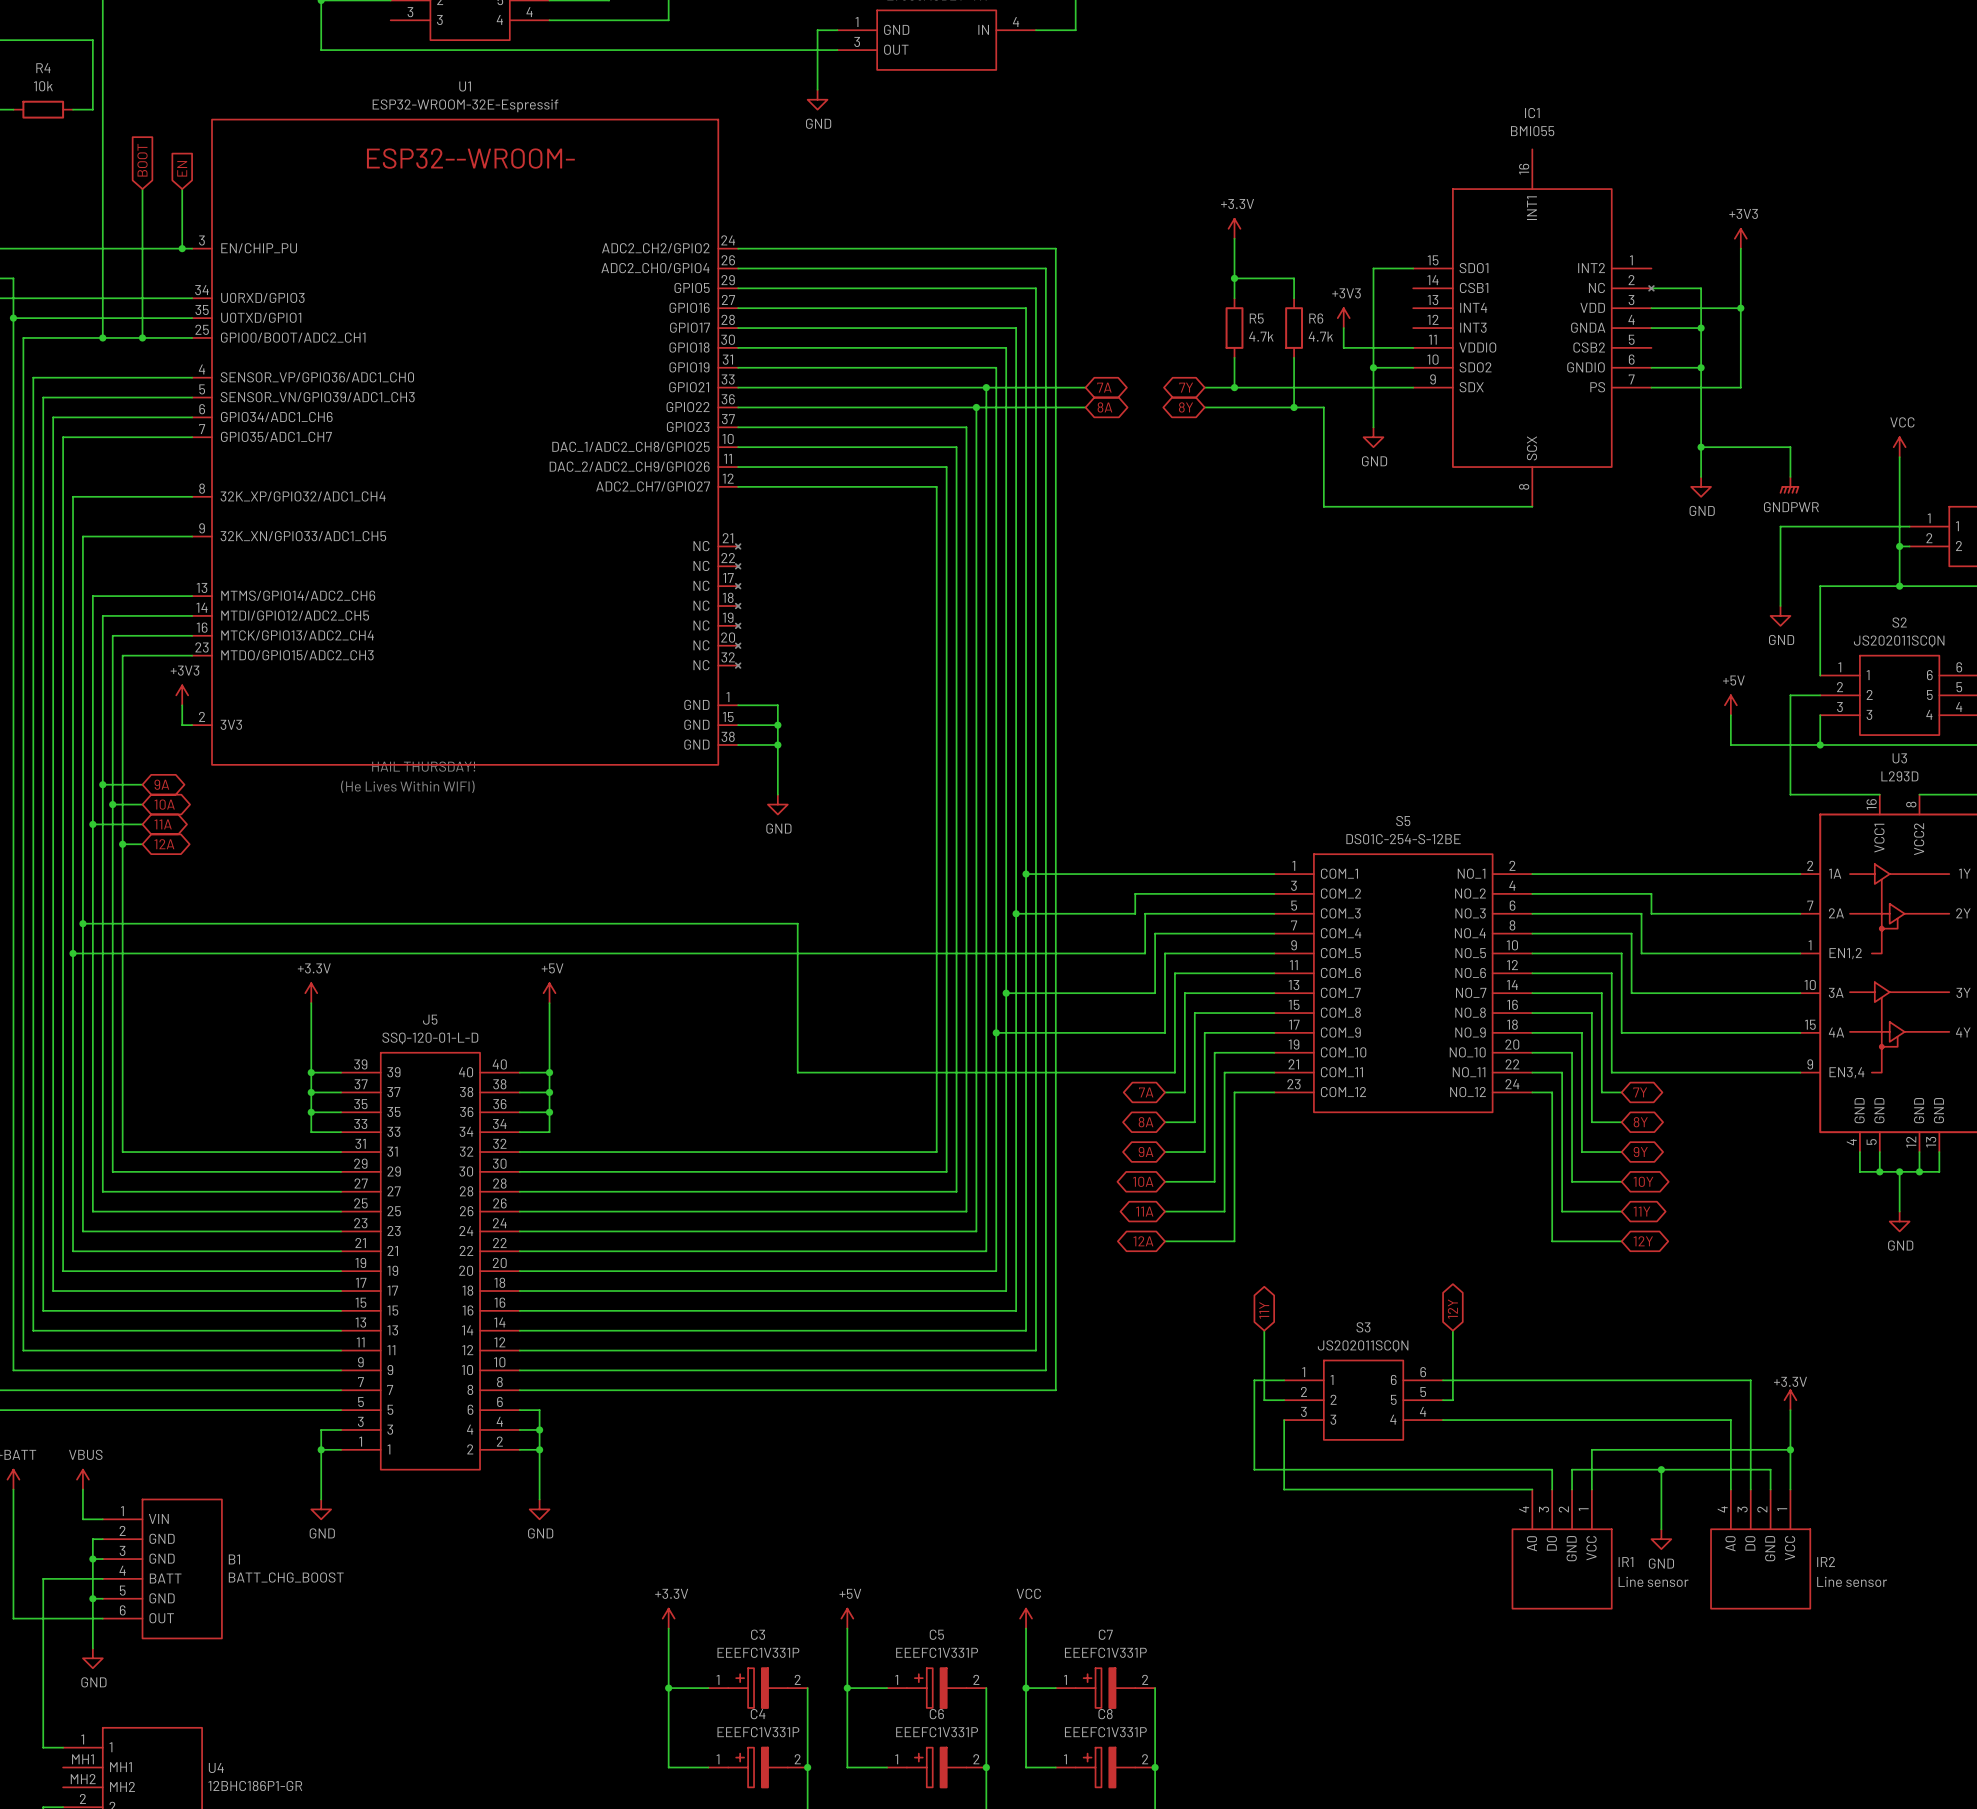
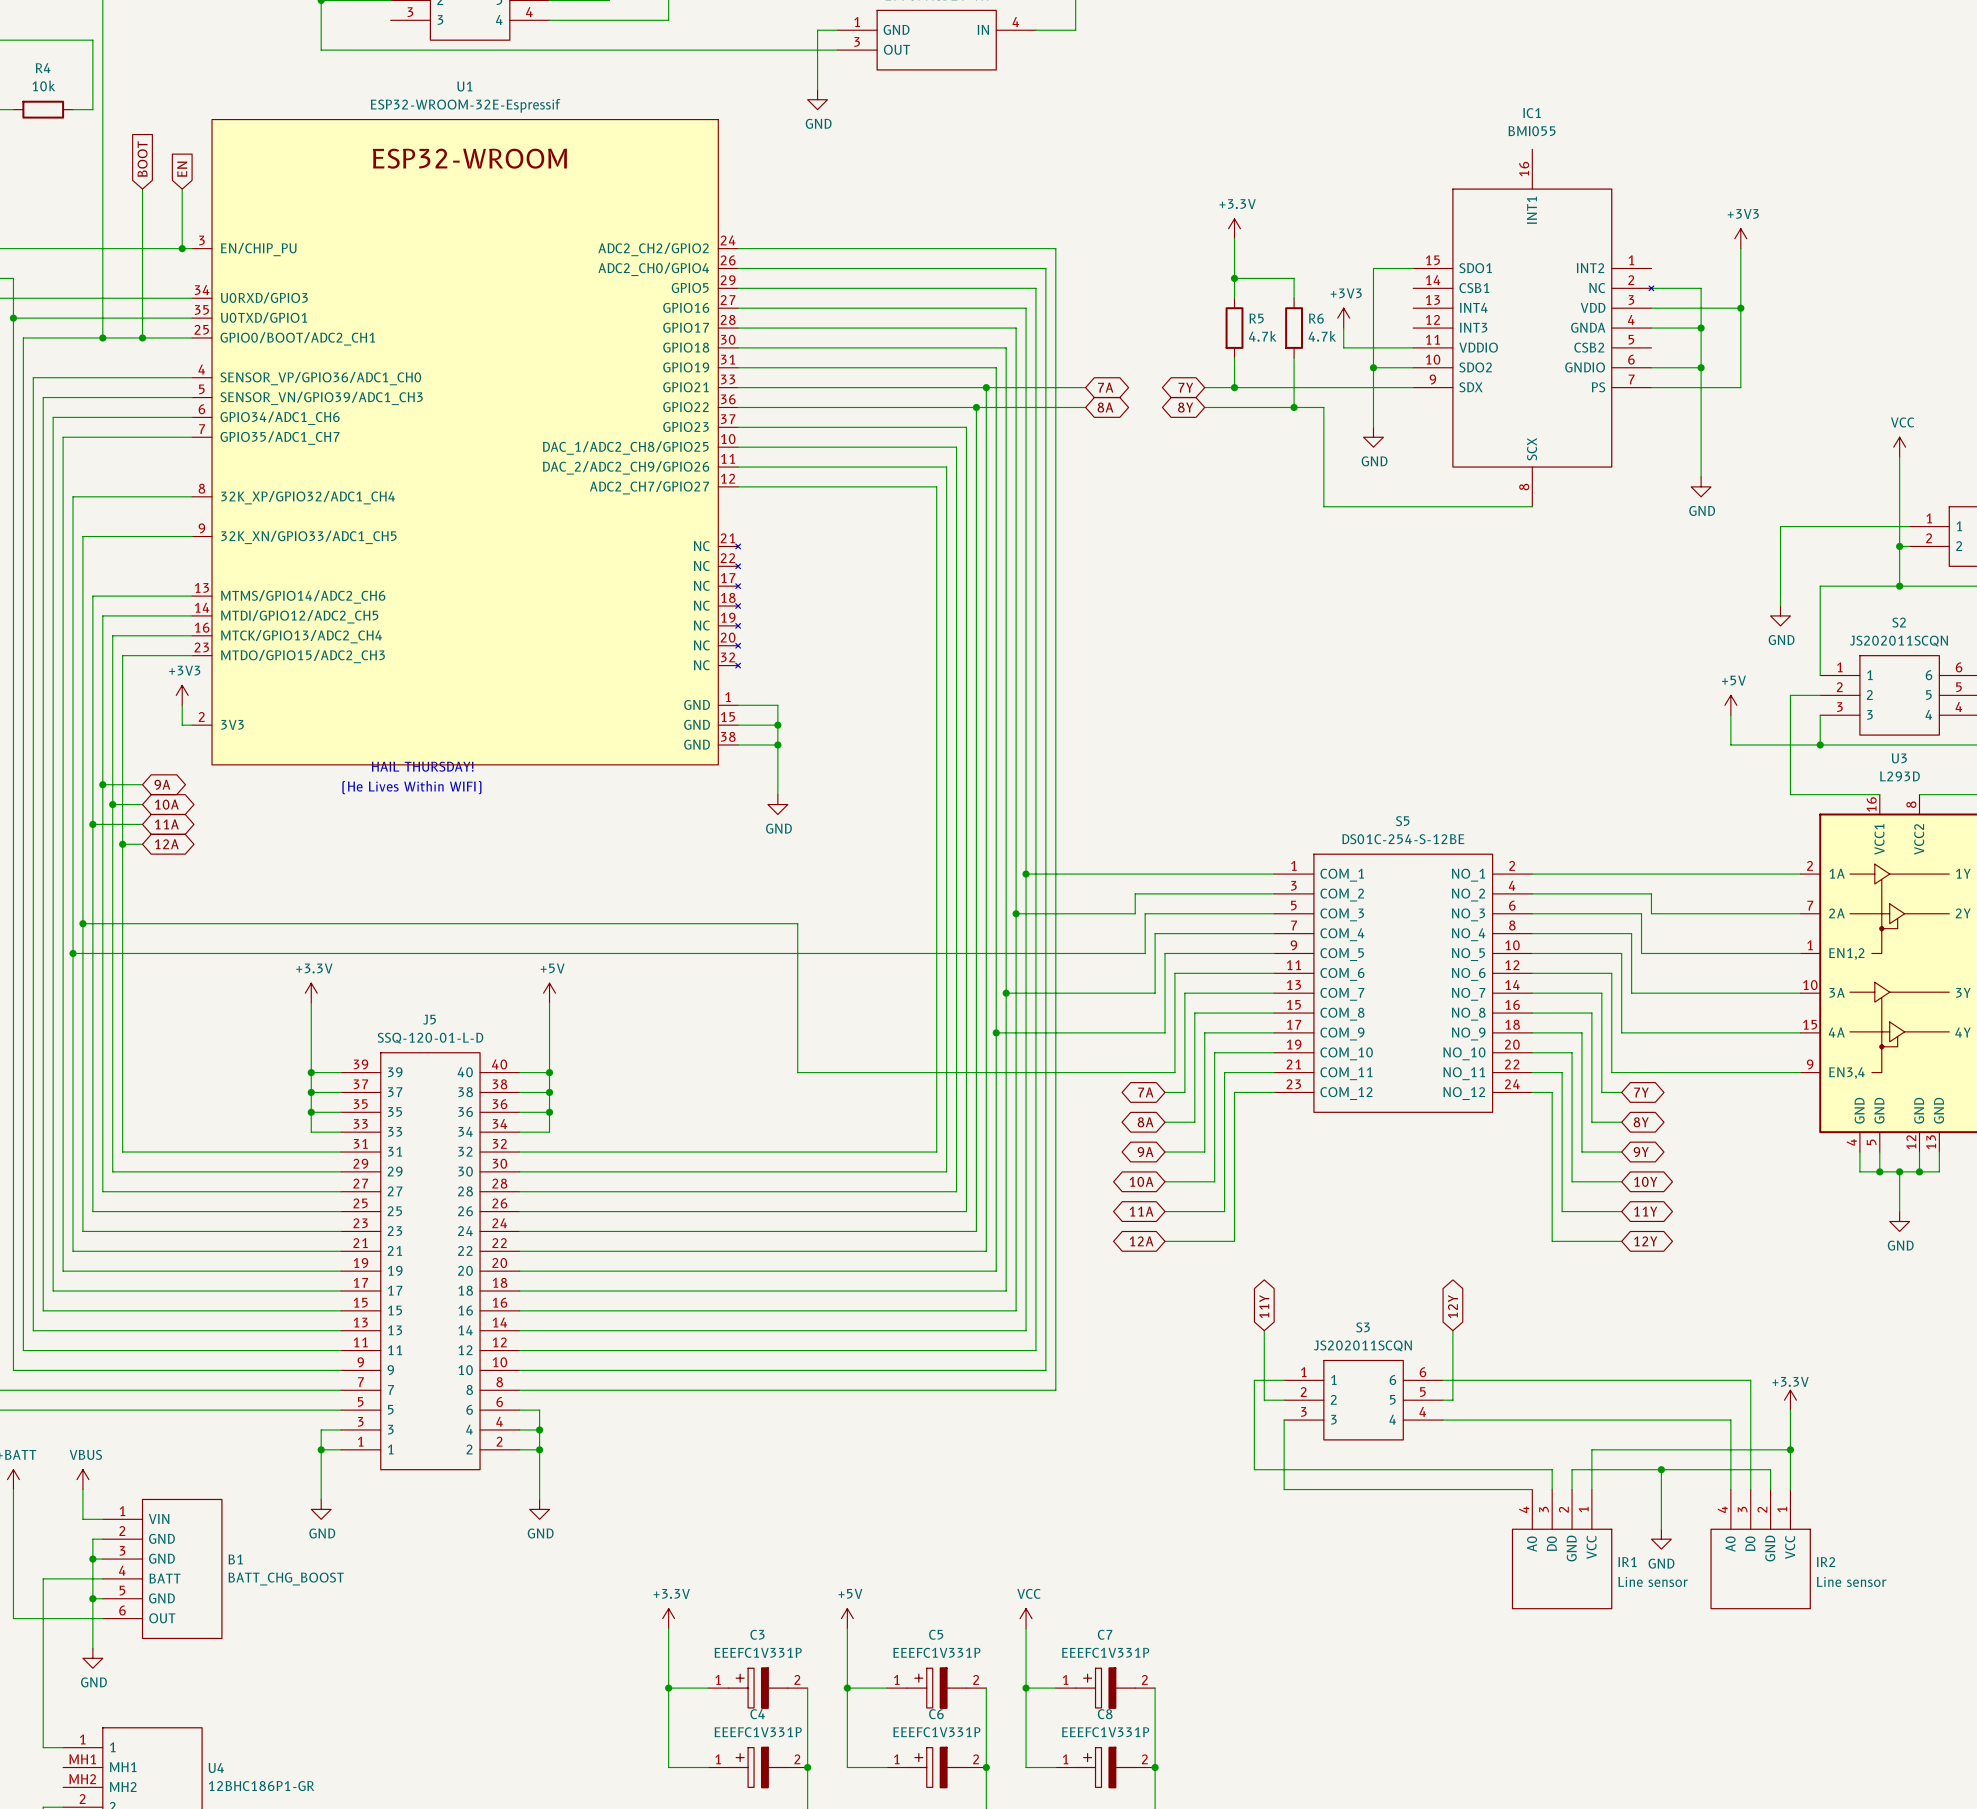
wire: (1701, 447) (1790, 447) (1790, 476) -> none
junction: (1701, 447) -> none
power symbol: GNDPWR (1789, 485) -> none

